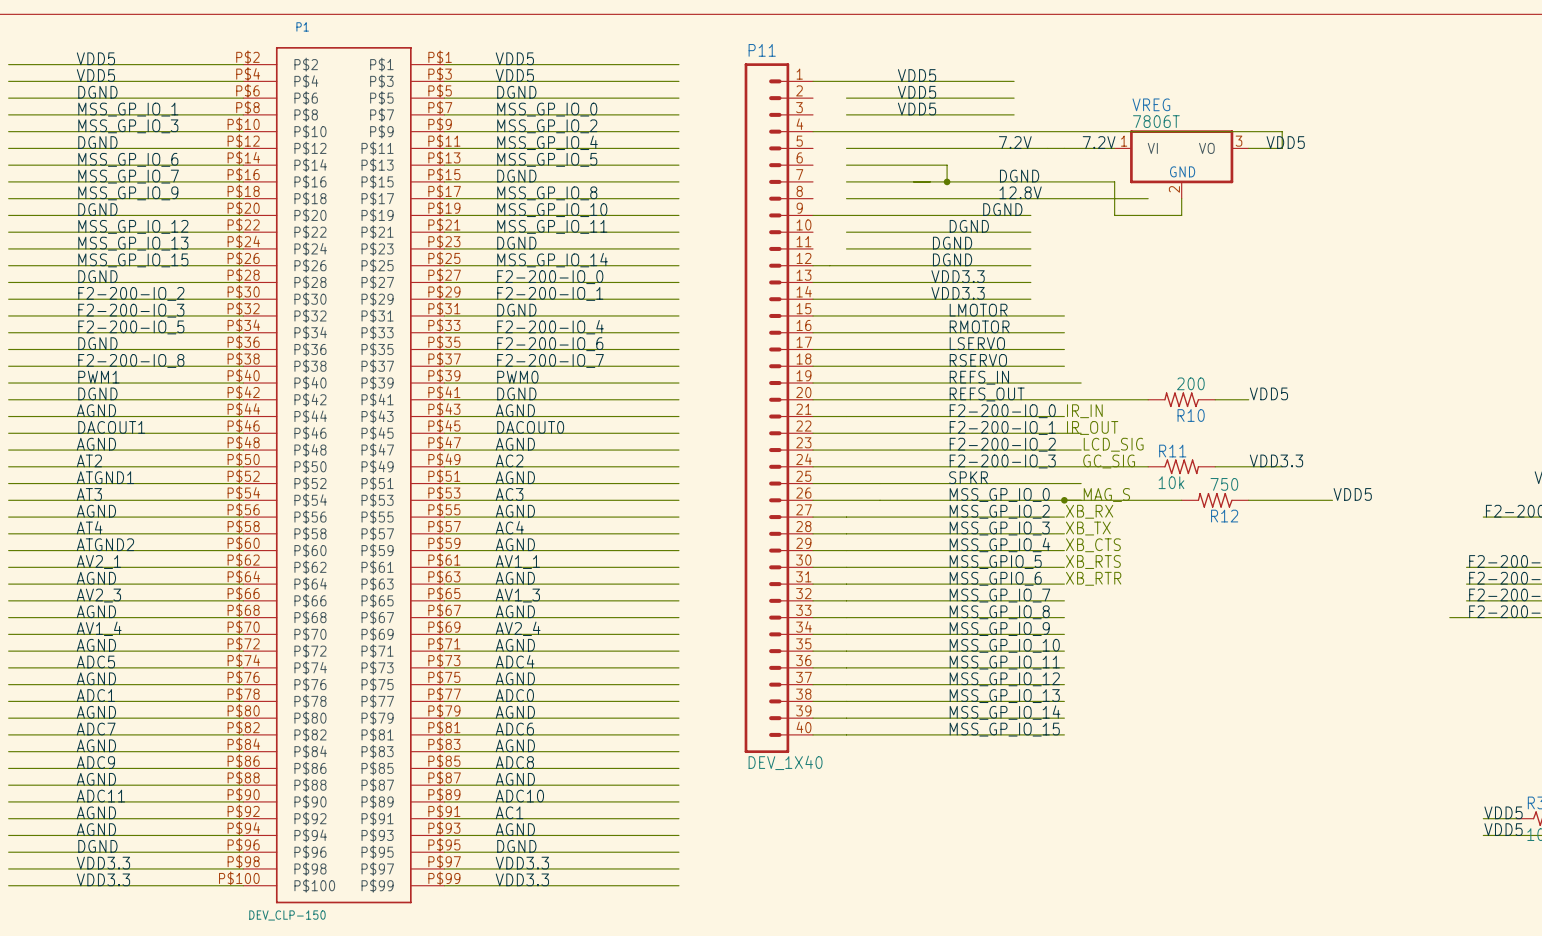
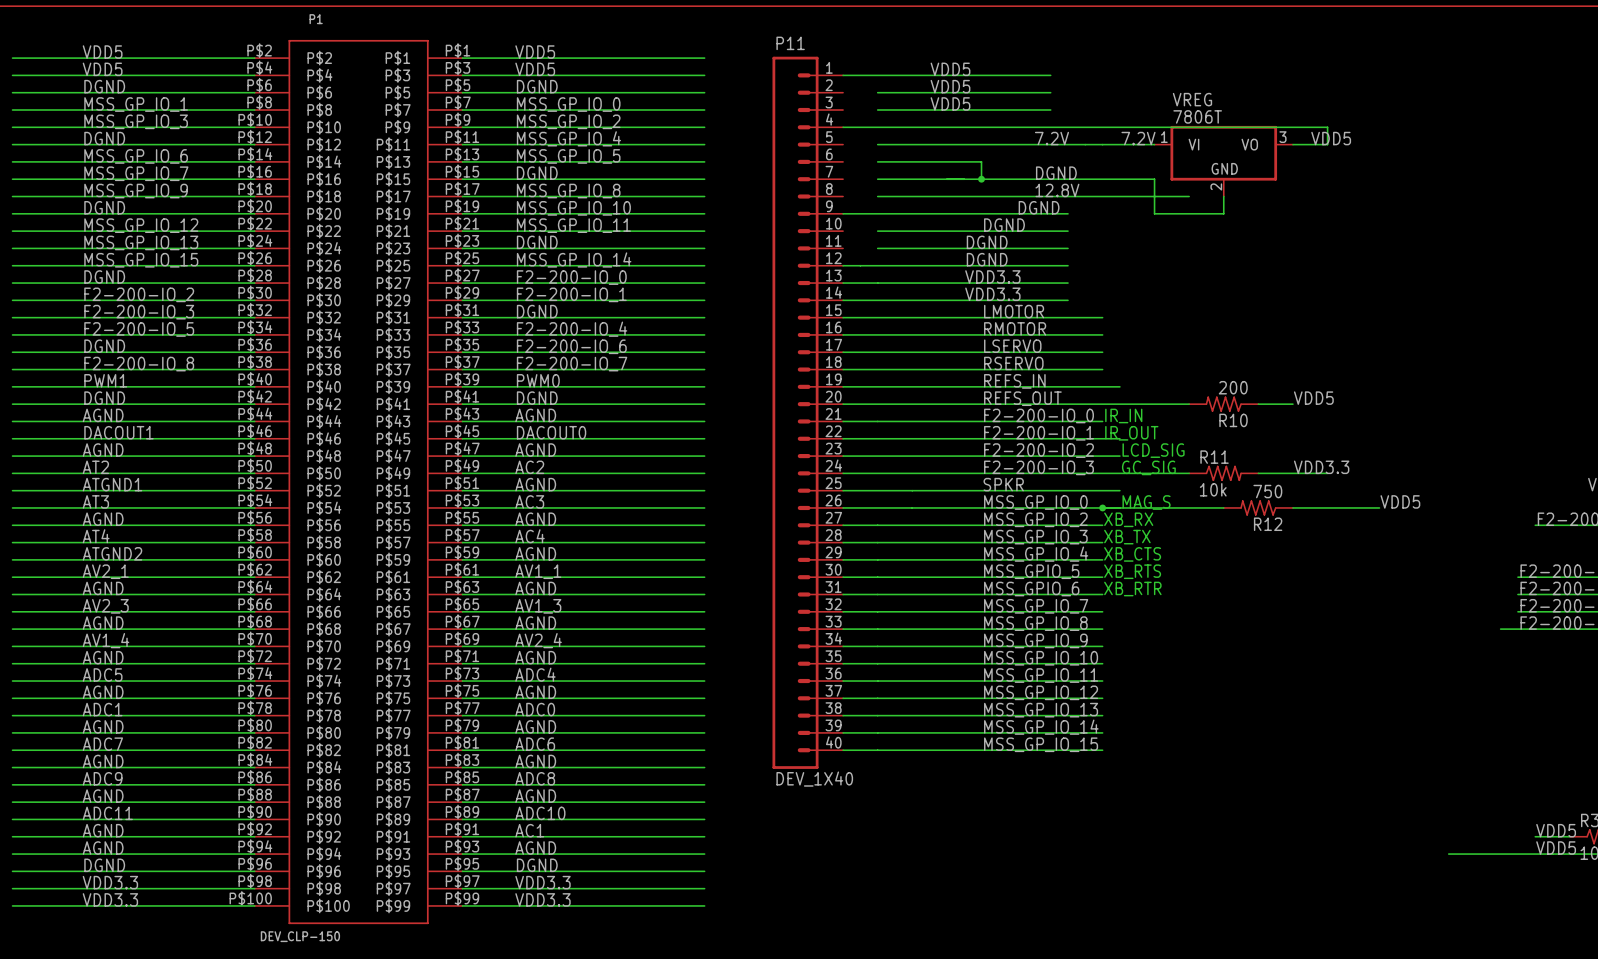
wire: none -> (1448, 854) (1535, 854)

